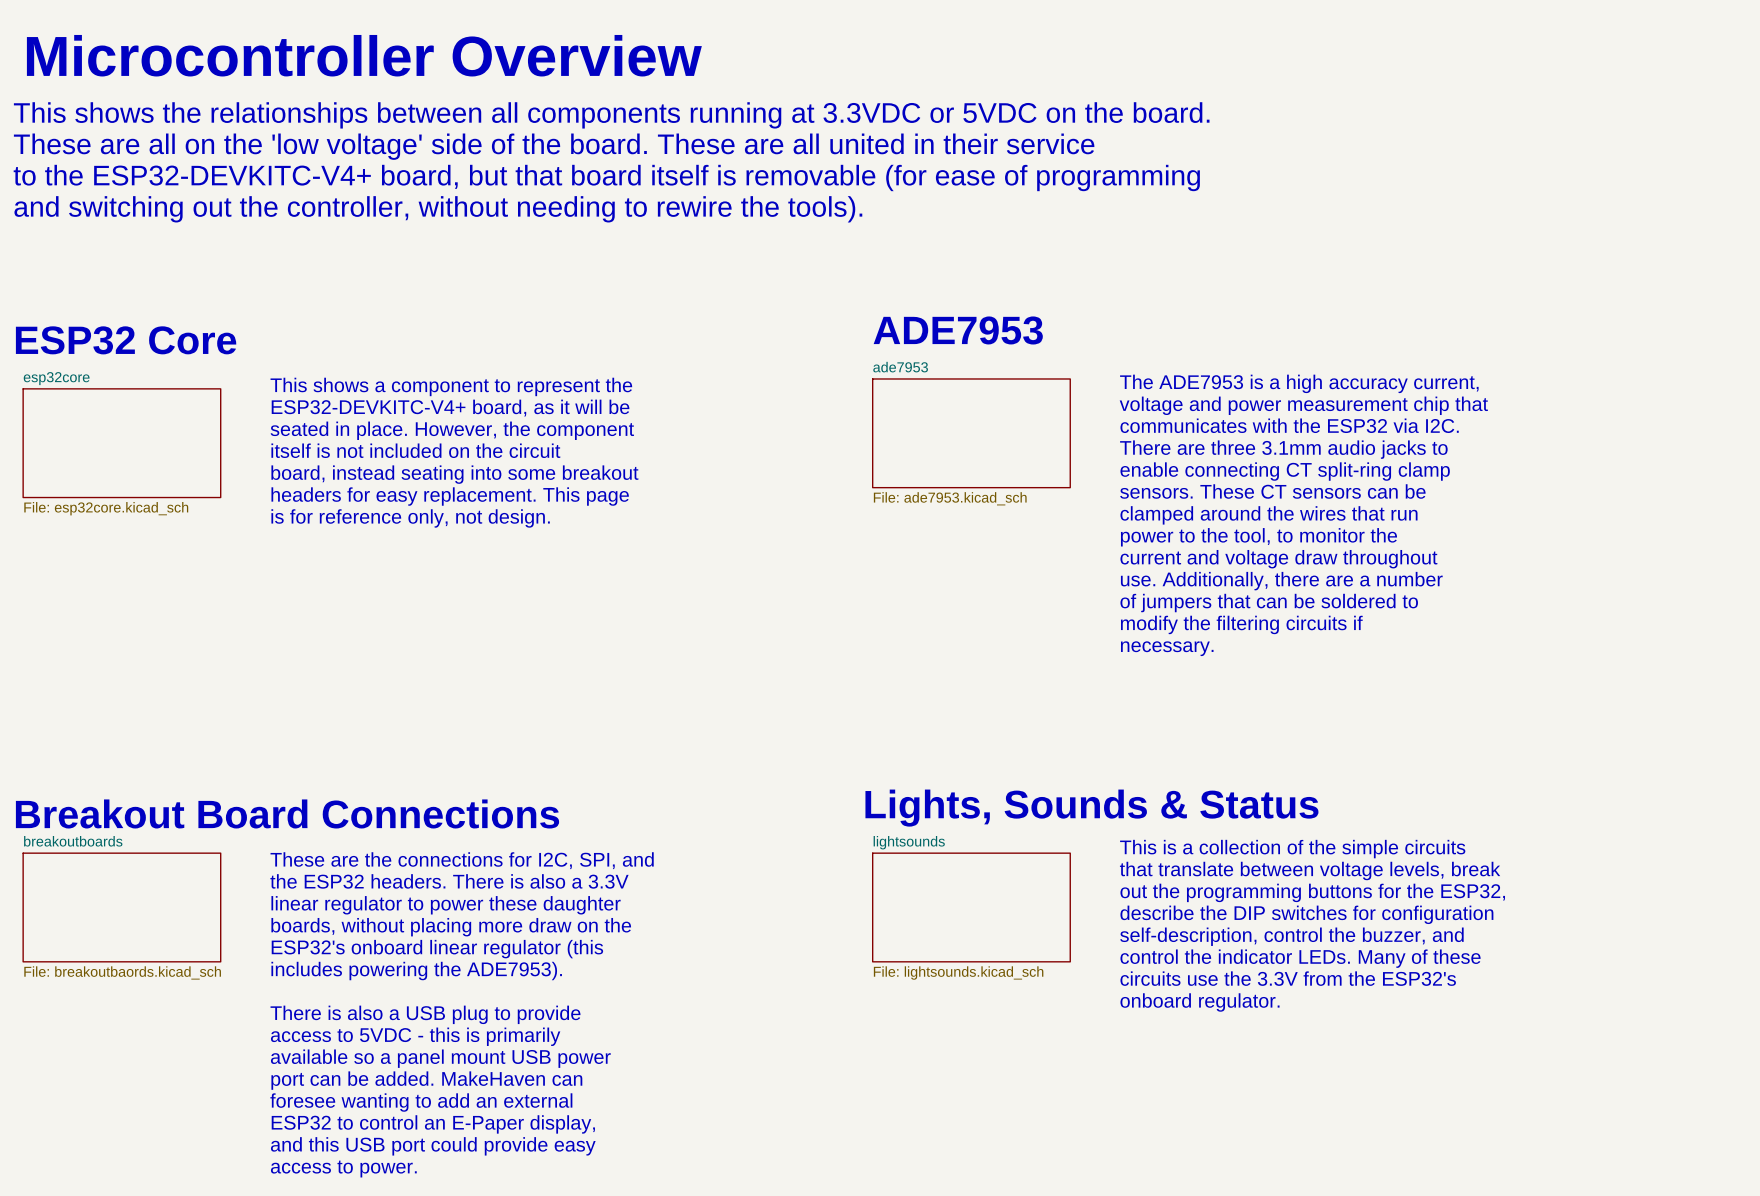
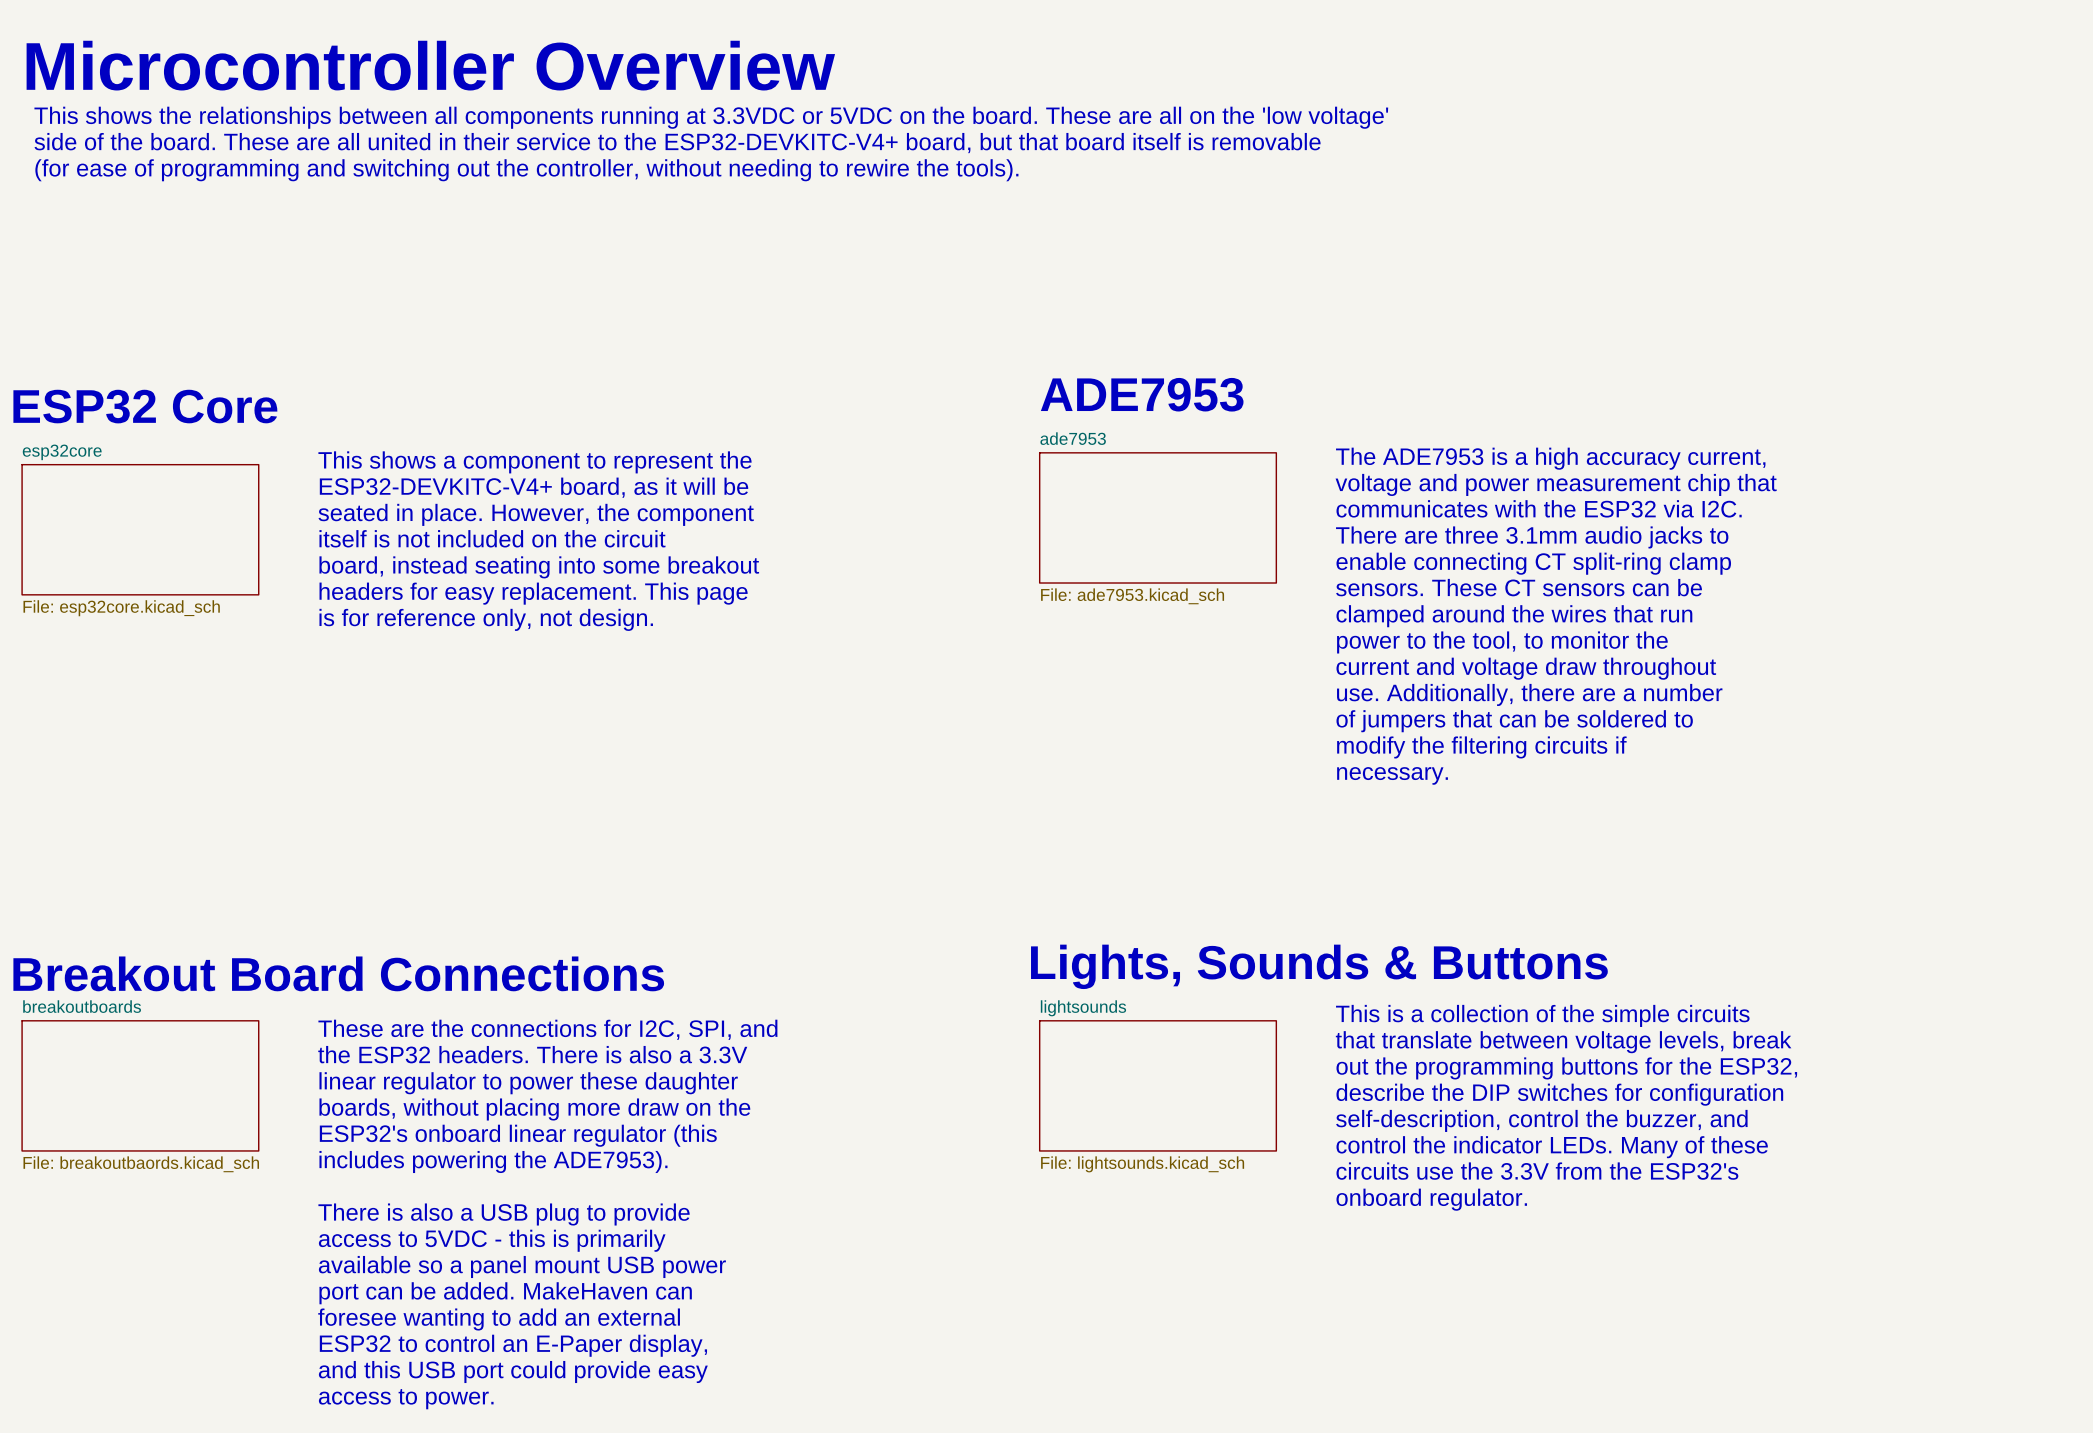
text: This shows the relationships between all components running at 3.3VDC or 5VDC on the board. (611, 115) -> This shows the relationships between all components running at 3.3VDC or 5VDC on the board. These are all on the 'low voltage' (711, 117)
text: none -> side of the board. These are all united in their service to the ESP32-DEVKITC-V4+ board, but that board itself is removable (677, 143)
text: none -> (for ease of programming and switching out the controller, without needing to rewire the tools). (526, 170)
text: These are all on the 'low voltage' side of the board. These are all united in their service (554, 146) -> none
text: to the ESP32-DEVKITC-V4+ board, but that board itself is removable (for ease of programming (606, 177) -> none
text: and switching out the controller, without needing to rewire the tools). (438, 209) -> none
text: Lights, Sounds & Status (1091, 808) -> Lights, Sounds & Buttons (1319, 966)

